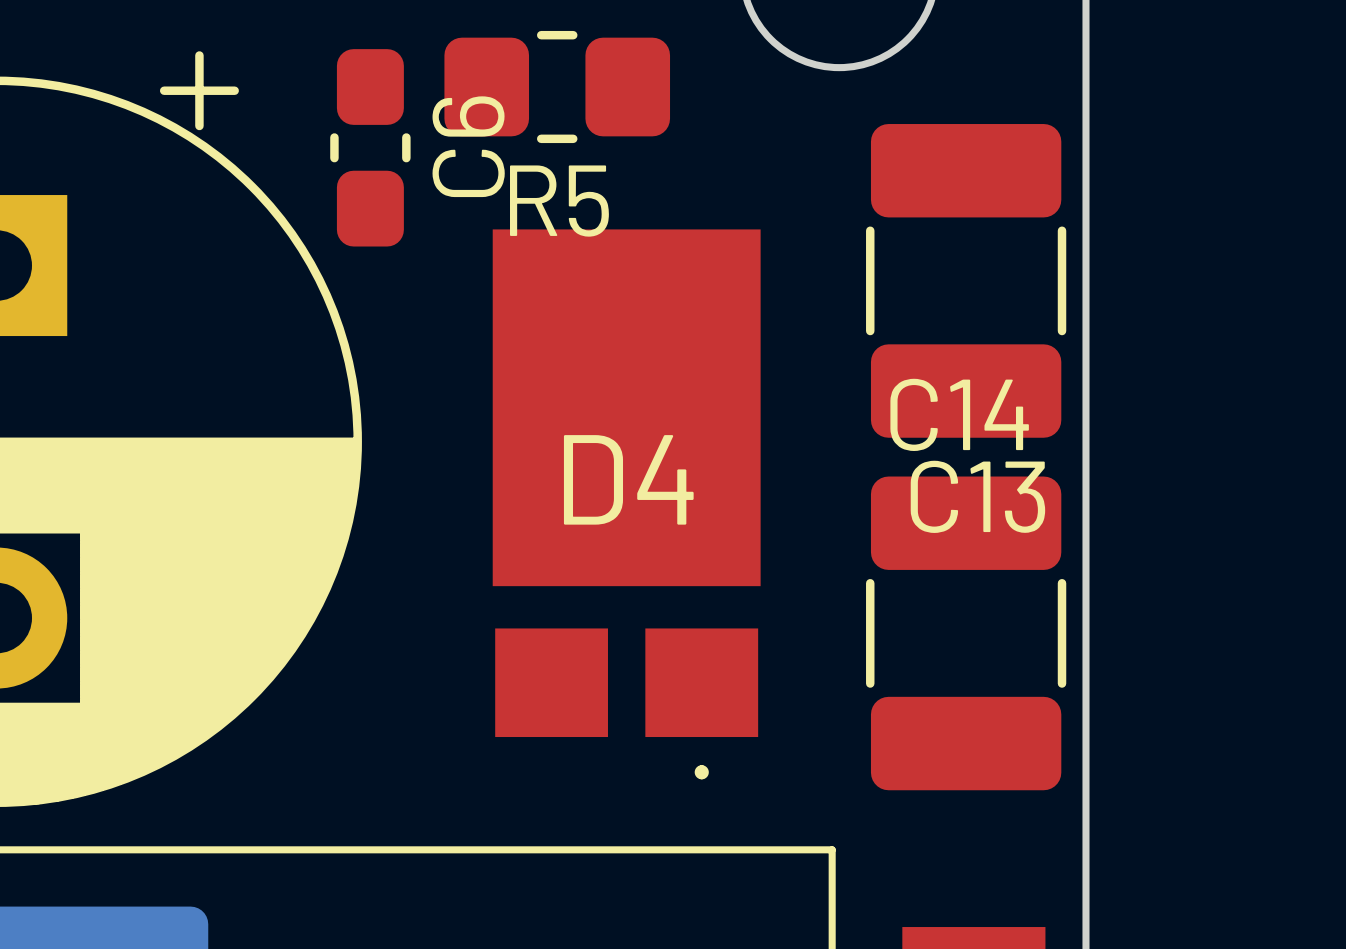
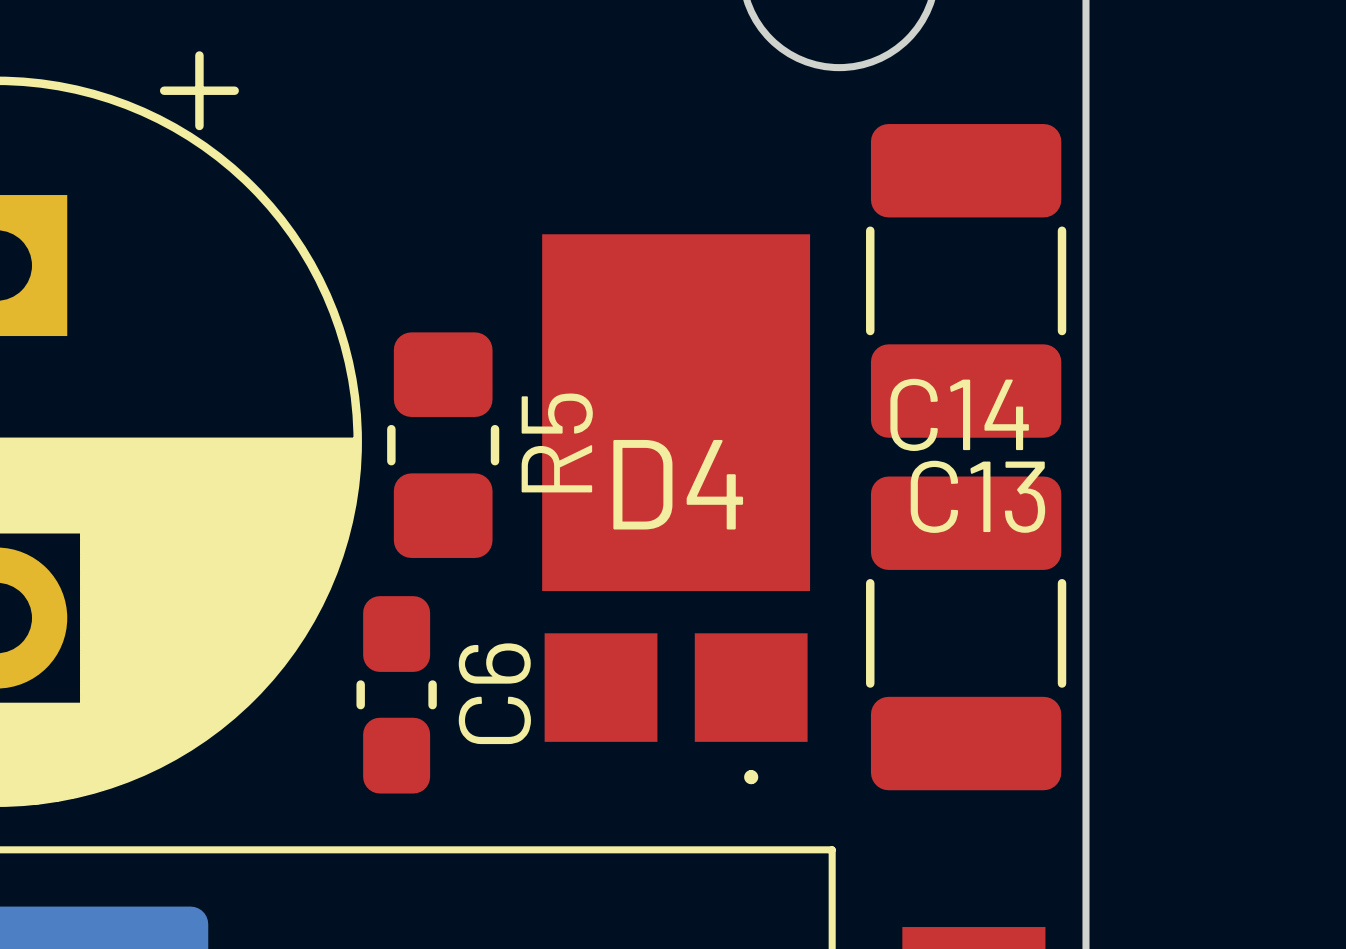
R5 rotation: 0° (557, 87) -> 90° clockwise (443, 445)
R5 position: (557, 87) -> (443, 445)
C6 position: (370, 147) -> (396, 694)
R5 name position: R5 (559, 201) -> R5 (557, 442)
D4 position: (626, 504) -> (676, 509)

